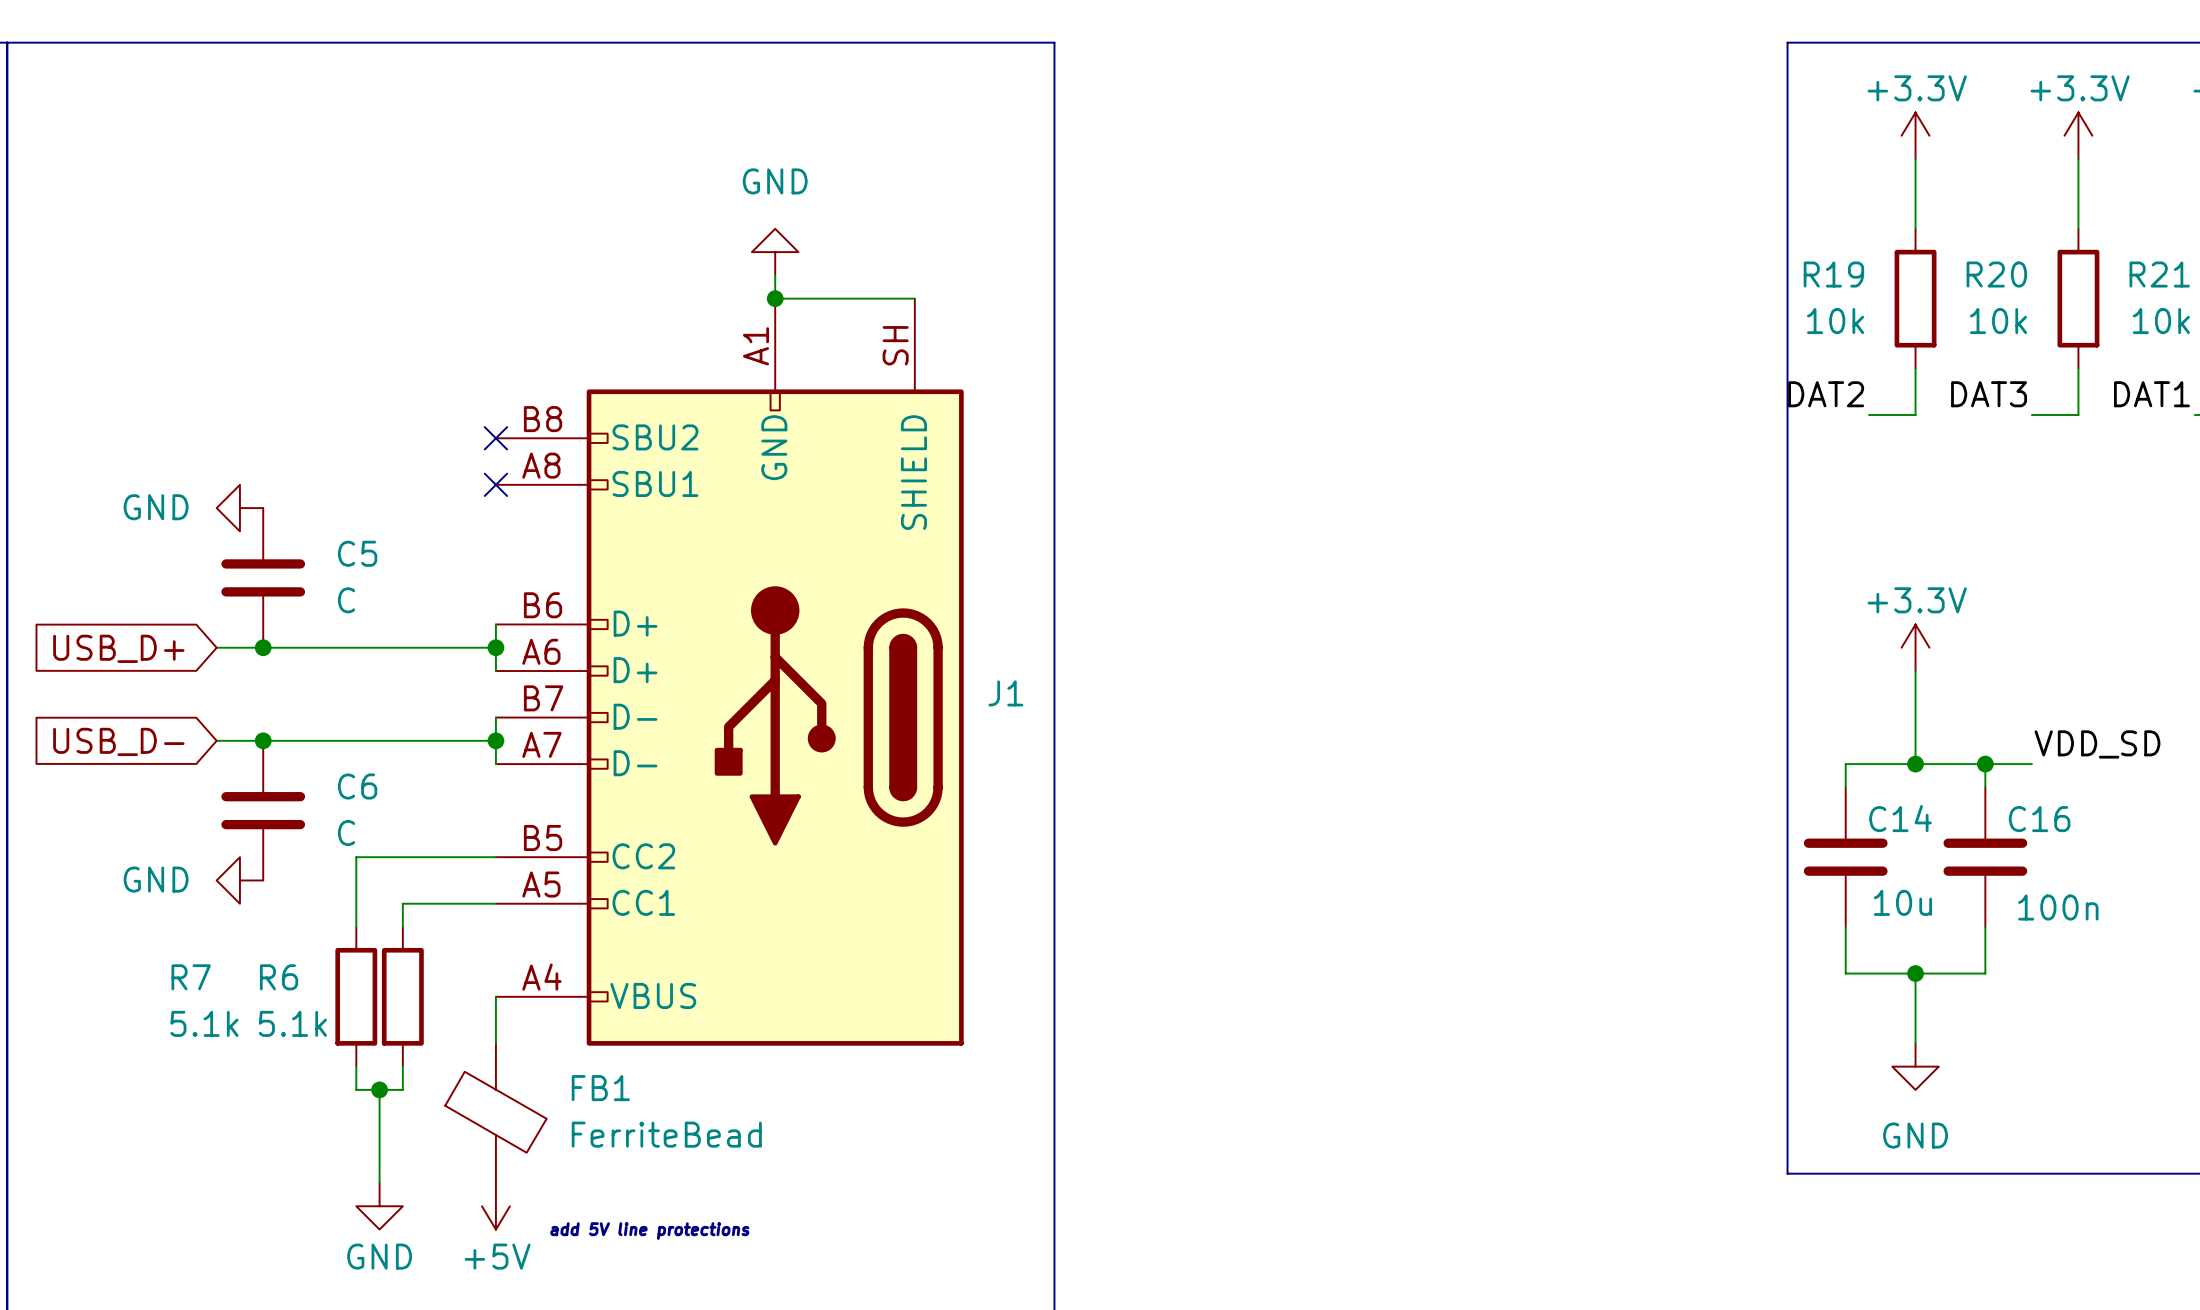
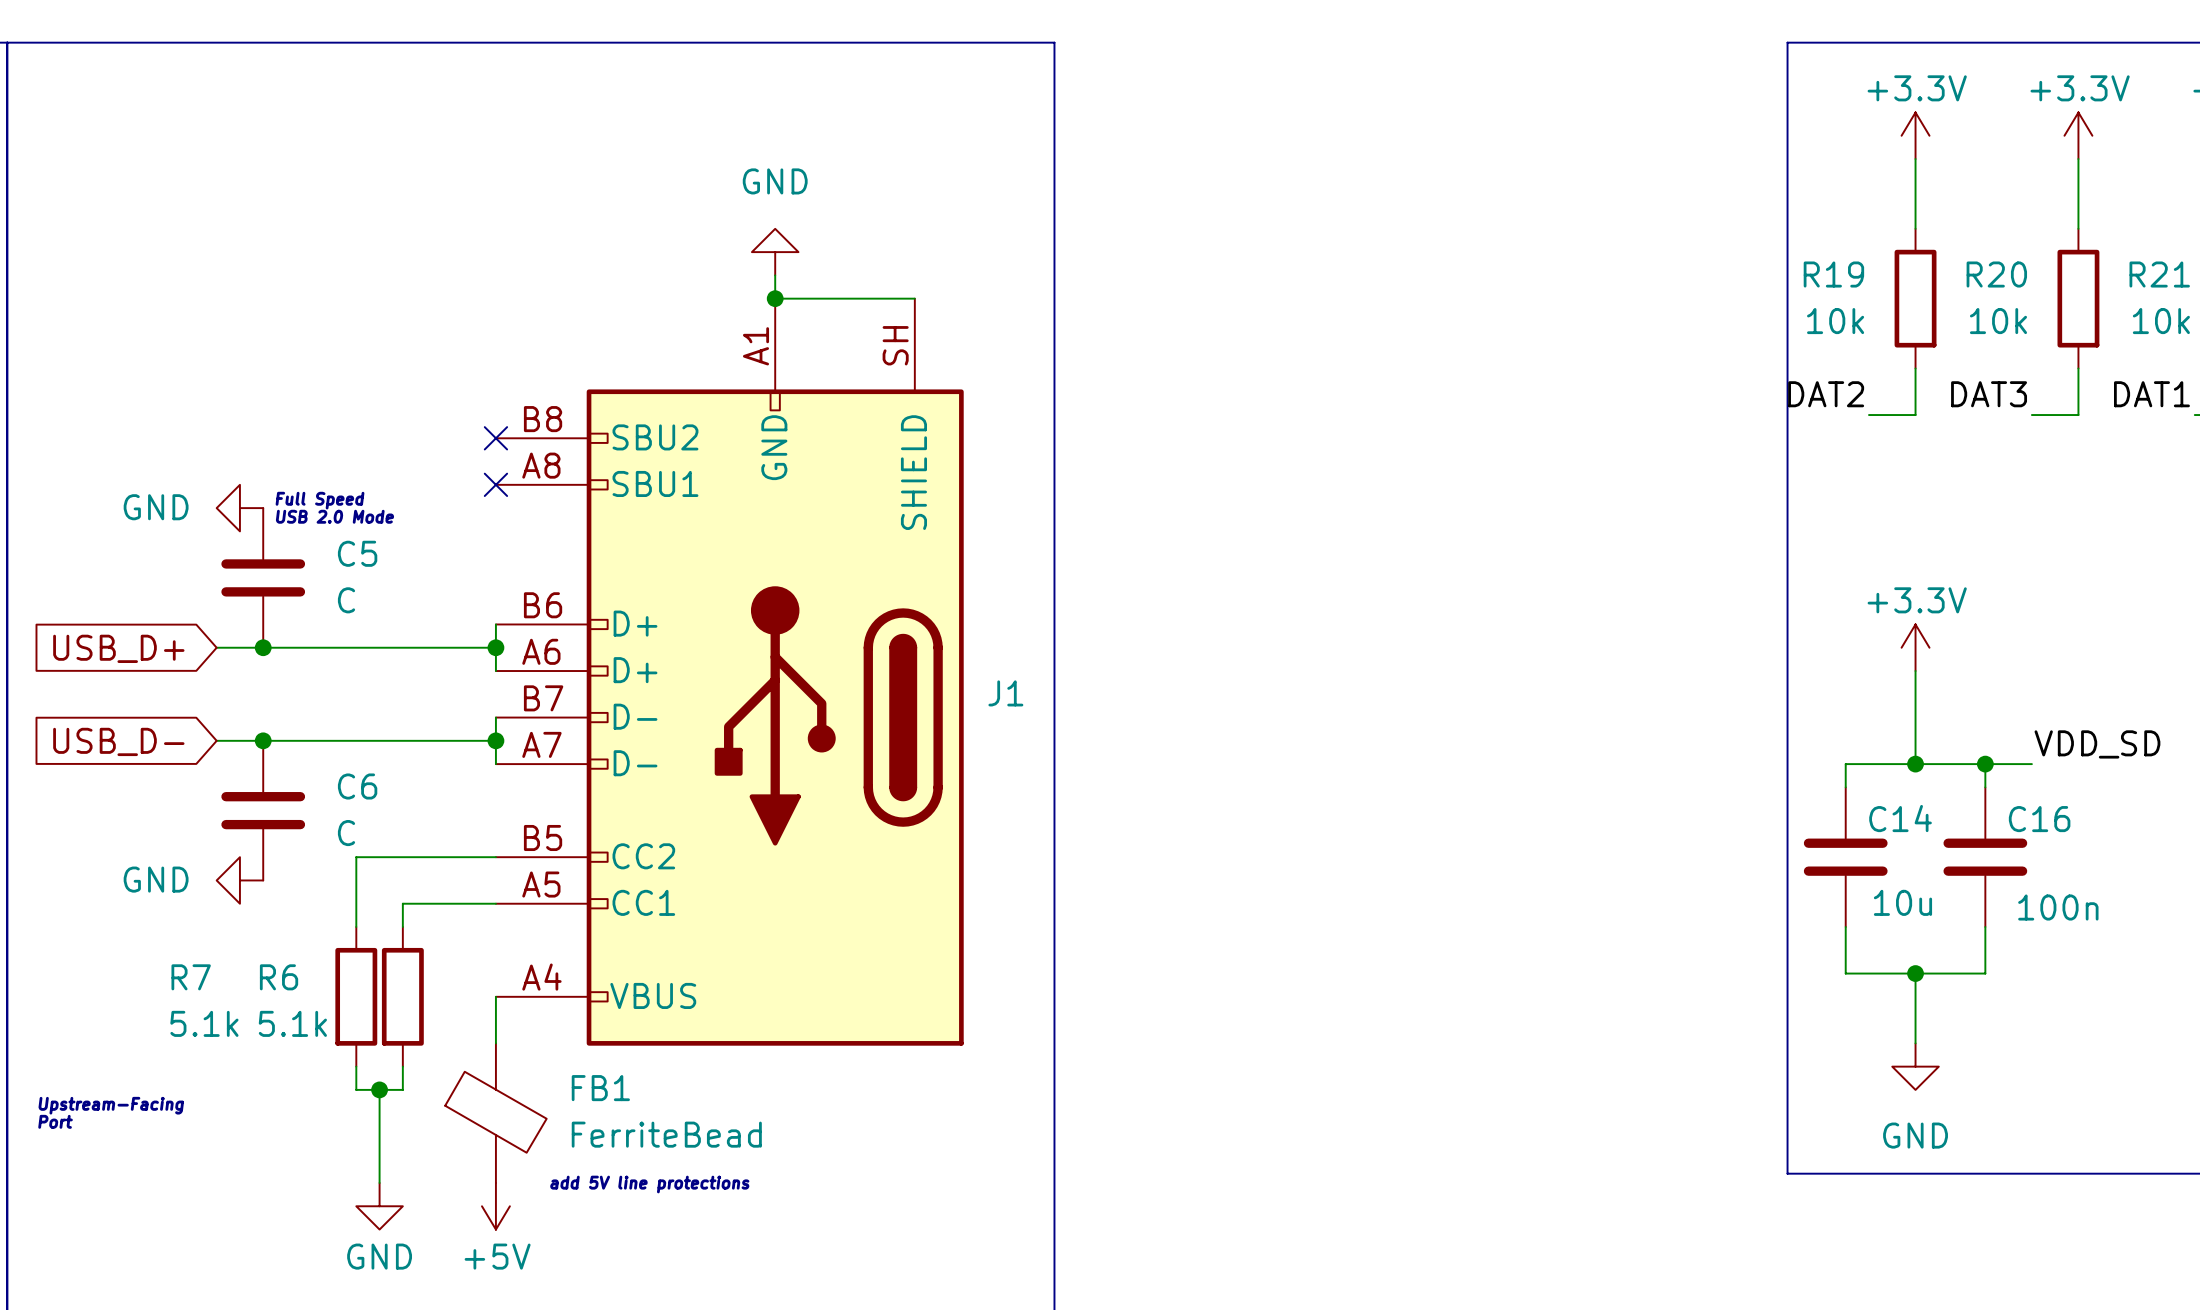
text: none -> Full Speed (320, 500)
text: none -> USB 2.0 Mode (334, 516)
text: none -> Upstream-Facing (111, 1105)
text: none -> Port (55, 1121)
text position: add 5V line protections (649, 1231) -> add 5V line protections (649, 1184)

